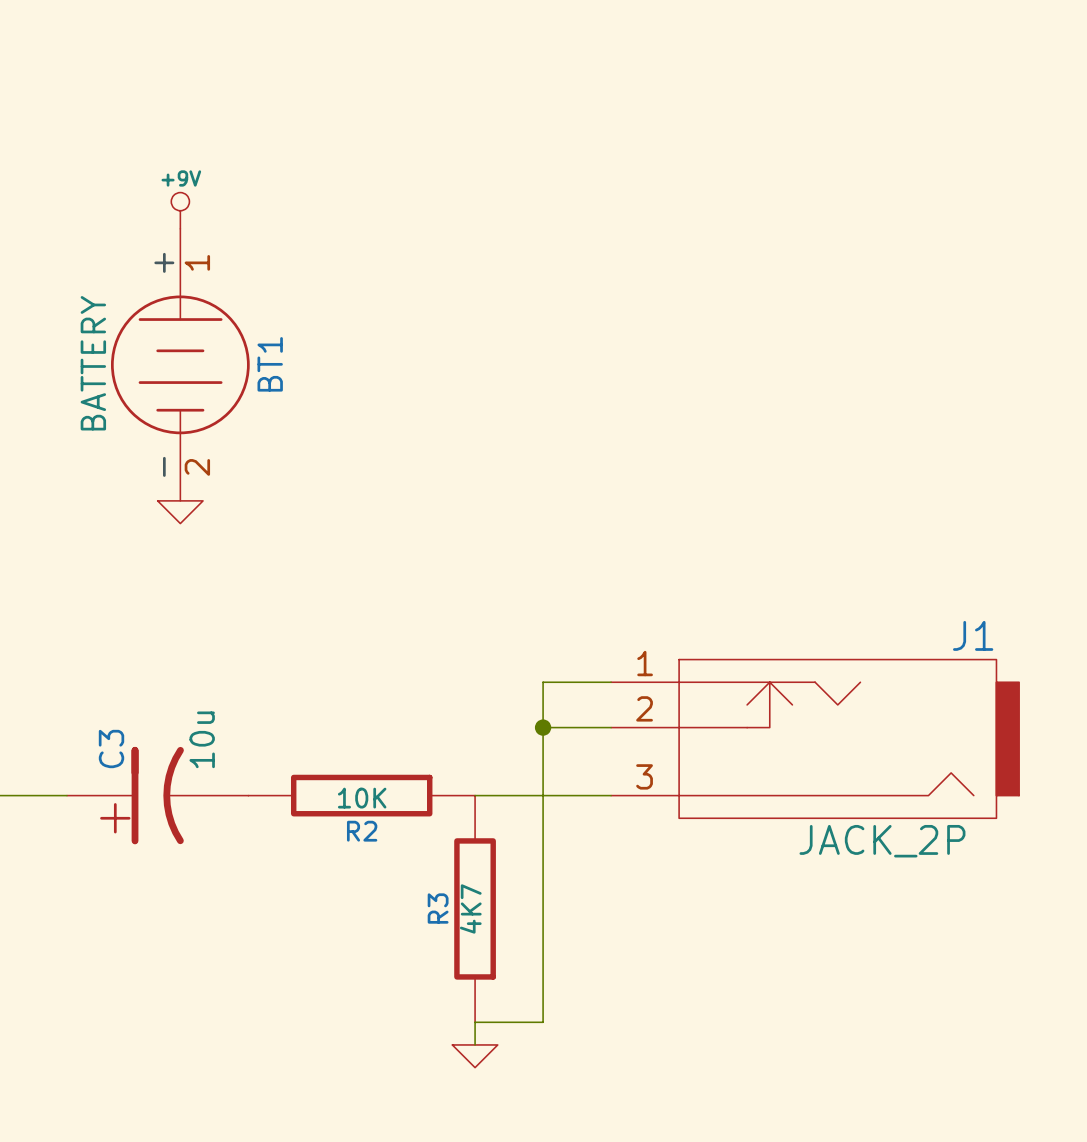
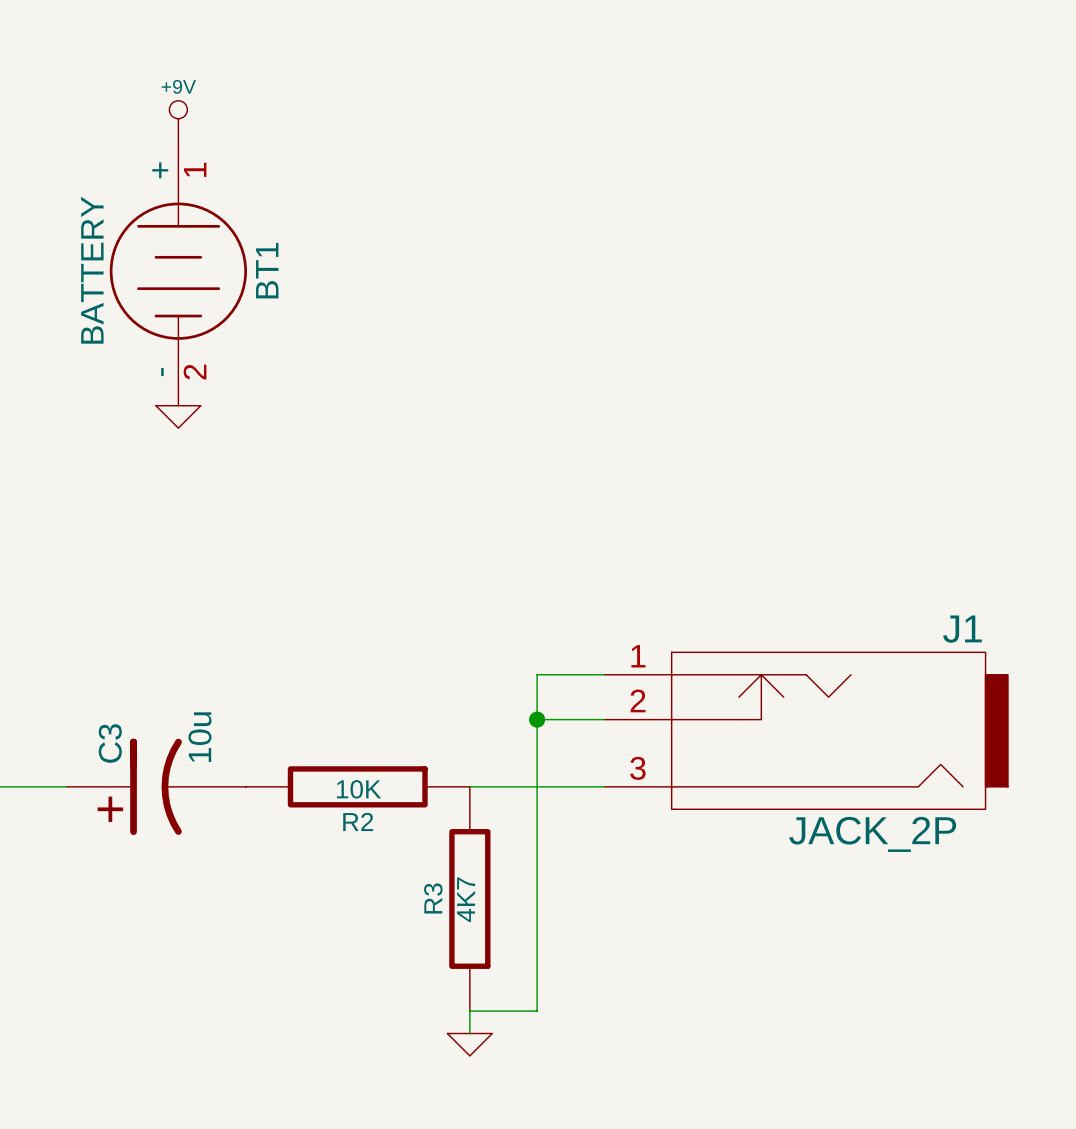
power symbol position: +9V (180, 210) -> +9V (178, 118)
BT1 position: (180, 364) -> (178, 271)
power symbol position: (180, 512) -> (178, 416)

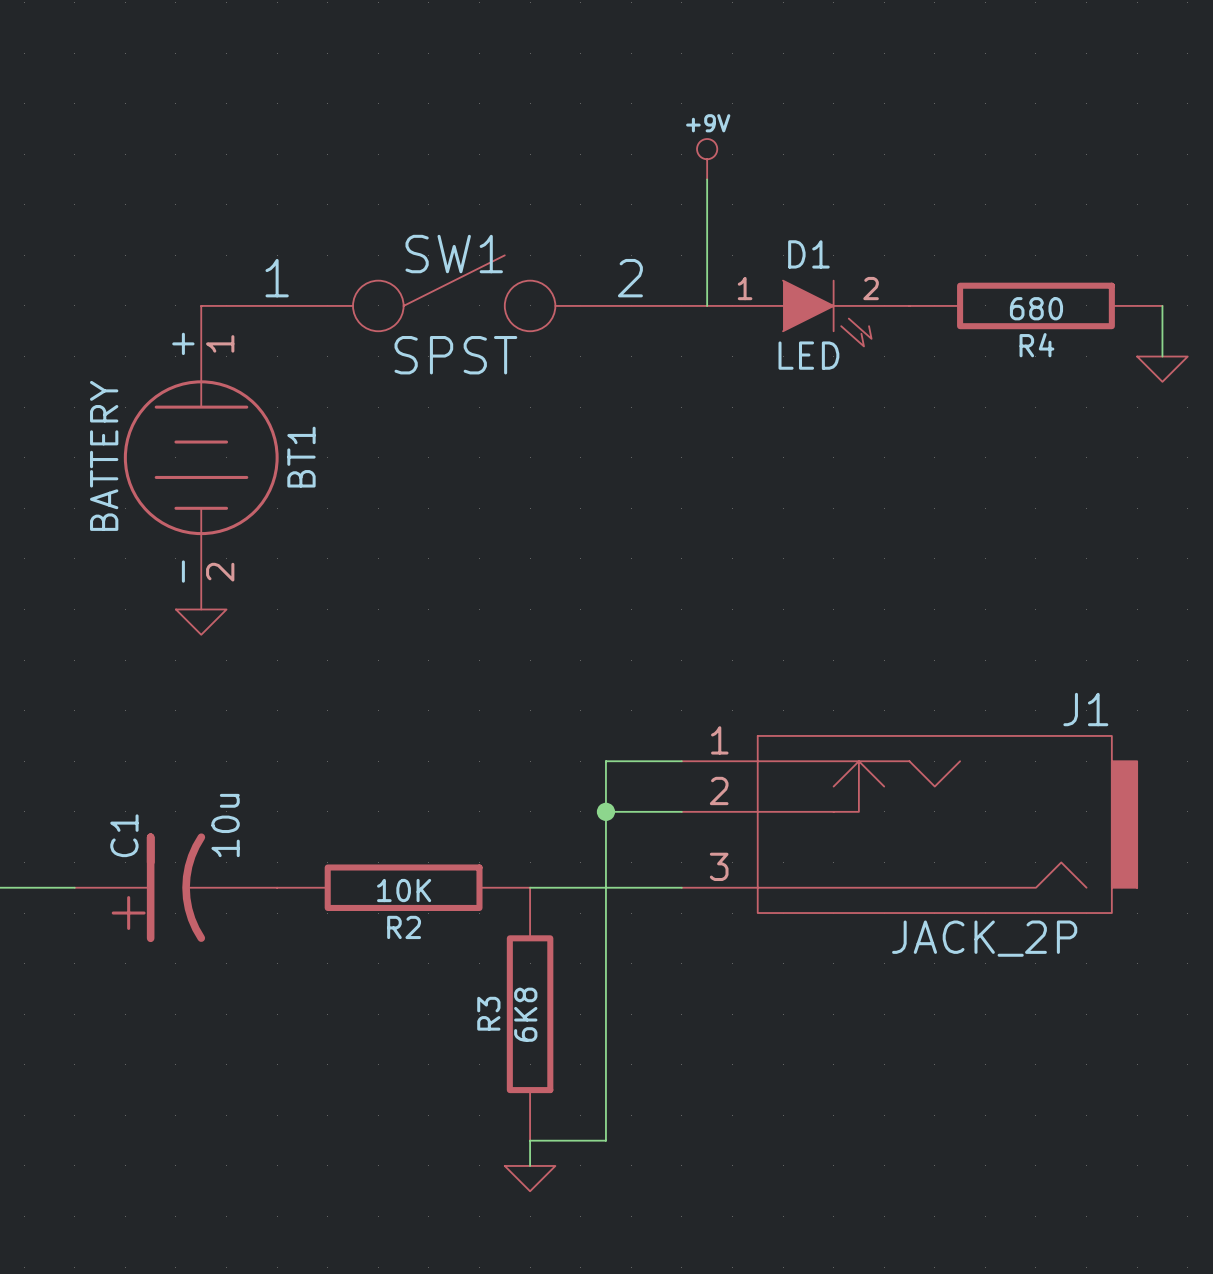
power symbol: +9V (178, 118) -> none
power symbol: none -> +9V (707, 159)
wire: none -> (707, 179) (707, 305)
SW1: none -> SPST (454, 293)
BT1 position: (178, 271) -> (201, 457)
R4: none -> 680 (1035, 305)
wire: none -> (1162, 305) (1162, 356)
D1: none -> LED (808, 313)
power symbol: none -> (1162, 369)
power symbol position: (178, 416) -> (201, 622)
C3 name: C3 (110, 743) -> C1 (124, 835)
R3 value: 4K7 (466, 899) -> 6K8 (525, 1014)

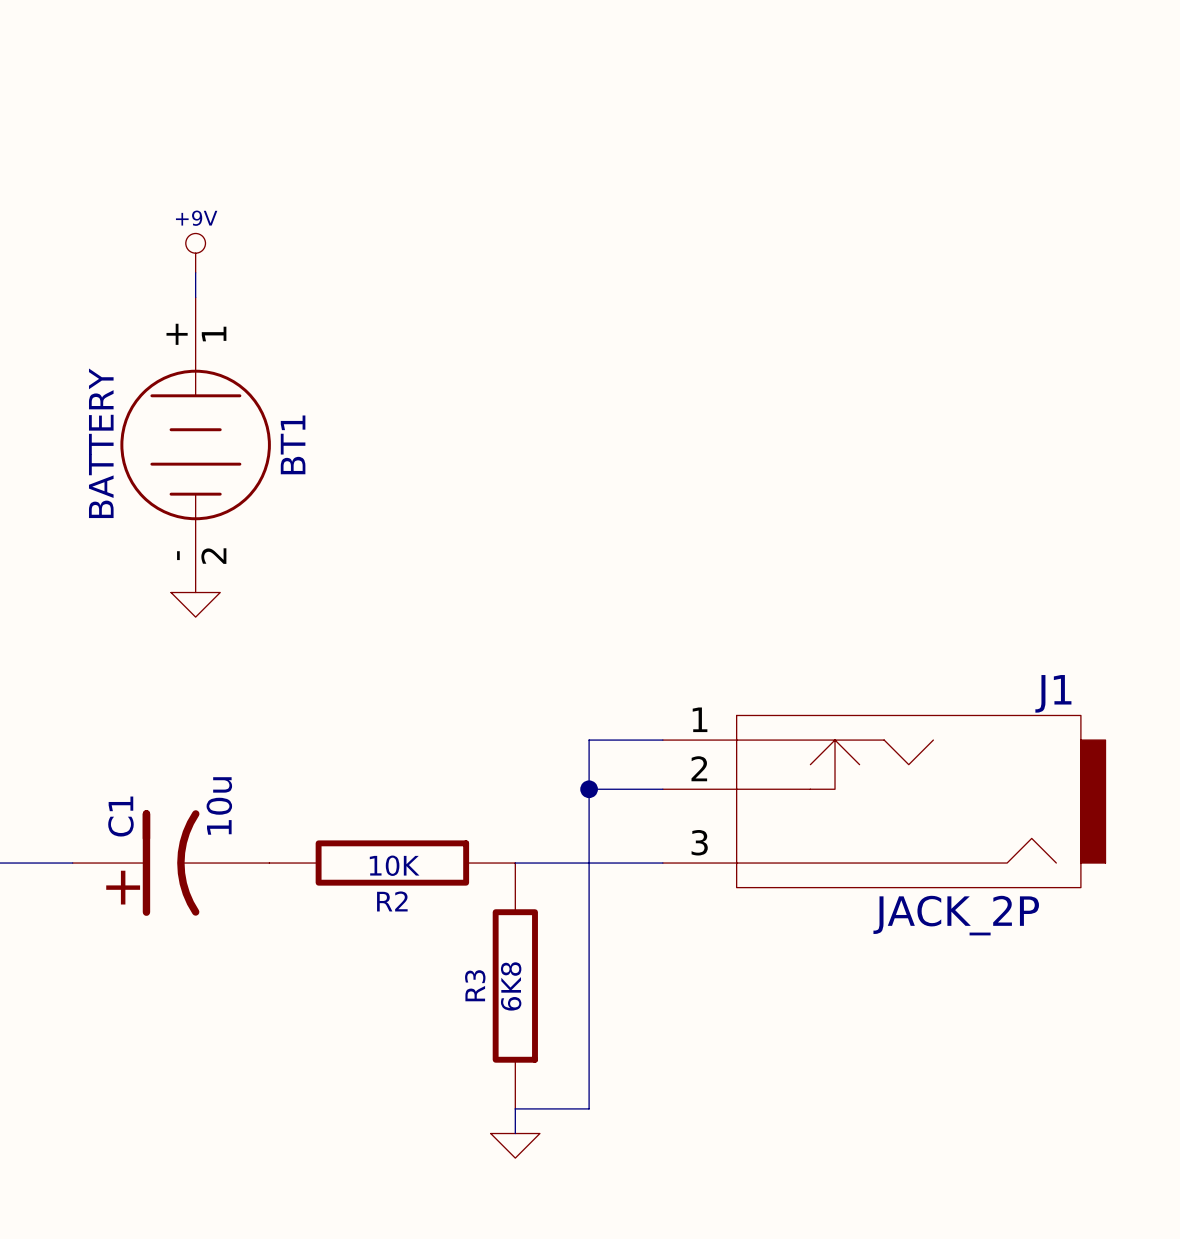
power symbol: +9V (707, 159) -> none
wire: (707, 179) (707, 305) -> none
power symbol: none -> +9V (195, 253)
wire: none -> (195, 272) (195, 297)
SW1: SPST (454, 293) -> none
R4: 680 (1035, 305) -> none
wire: (1162, 305) (1162, 356) -> none
D1: LED (808, 313) -> none
power symbol: (1162, 369) -> none

